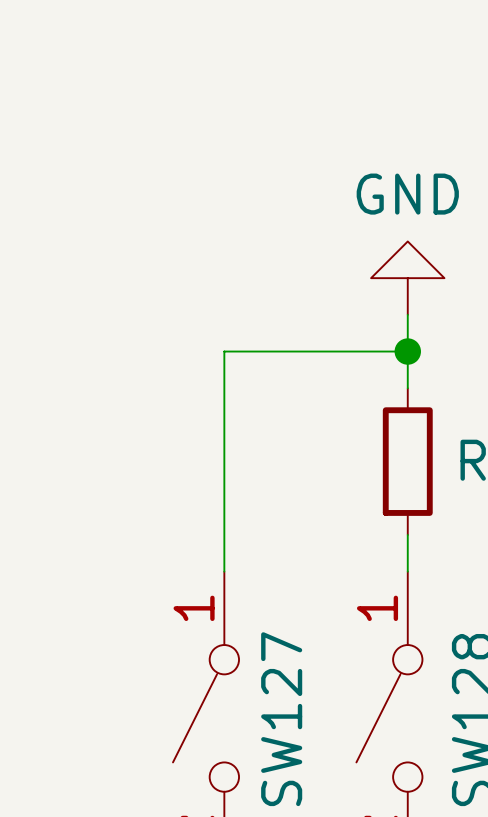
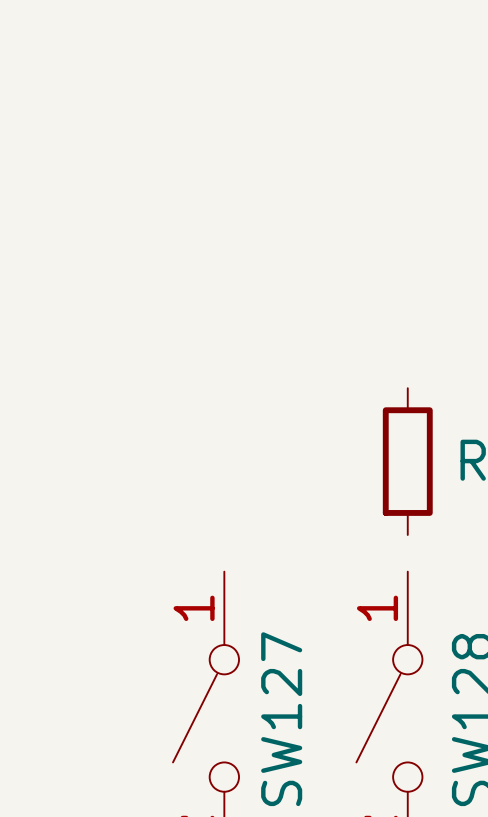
power symbol: GND (407, 278) -> none
wire: (407, 314) (407, 388) -> none
wire: (407, 351) (224, 351) (224, 571) -> none
junction: (407, 351) -> none
wire: (407, 534) (407, 571) -> none

